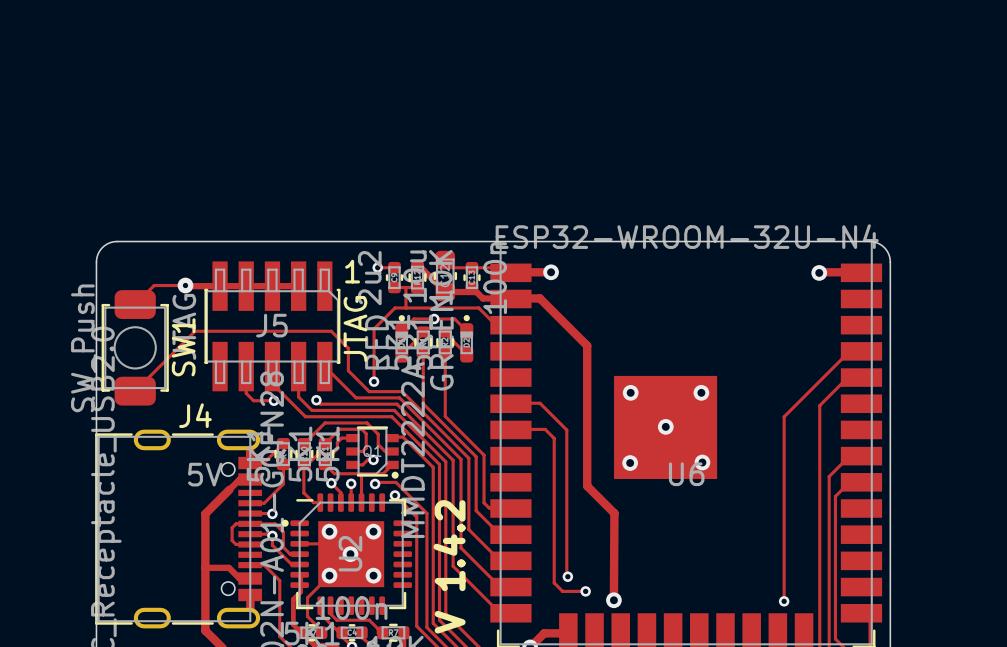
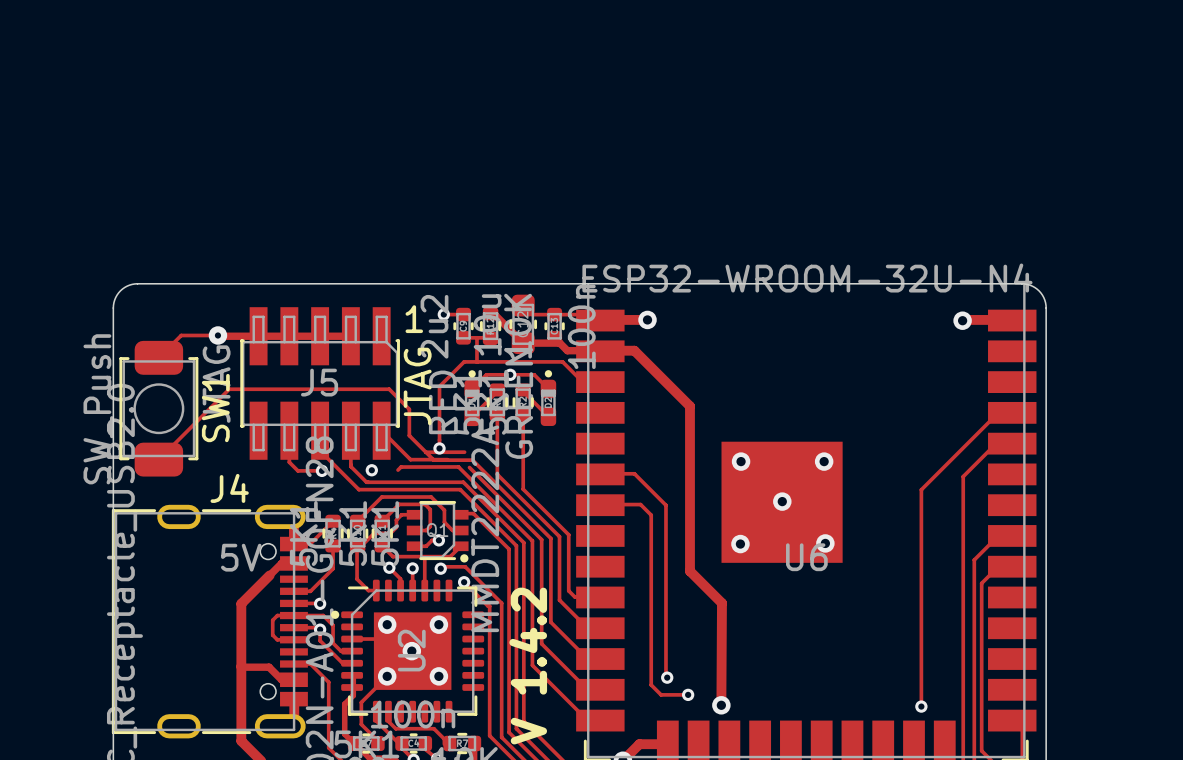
track: none -> (425, 452) (464, 452)
track: (349, 391) (356, 397) (399, 397) -> (410, 459) (447, 459)
track: (316, 400) (320, 404) (396, 404) -> (398, 470) (401, 467) (458, 466) (466, 474)

